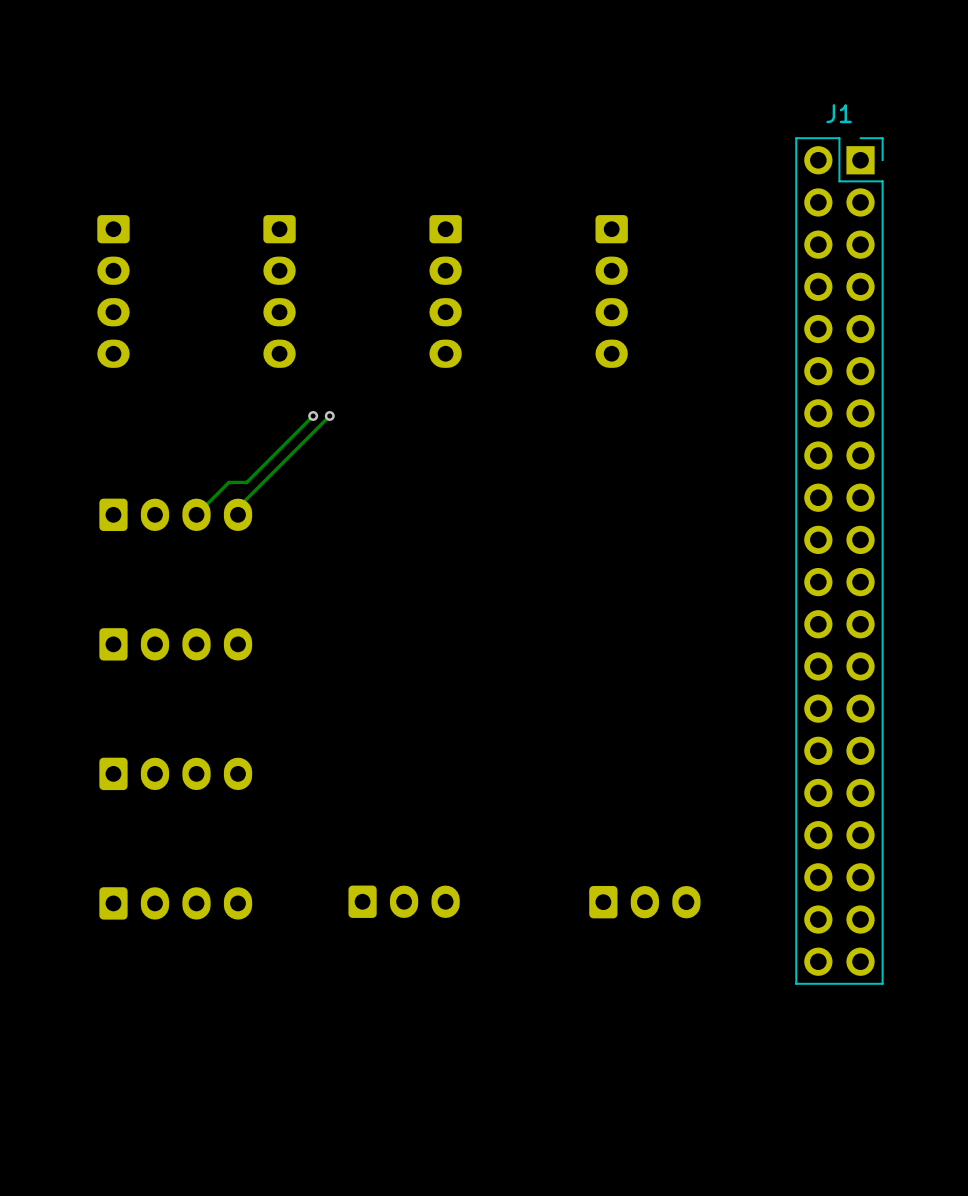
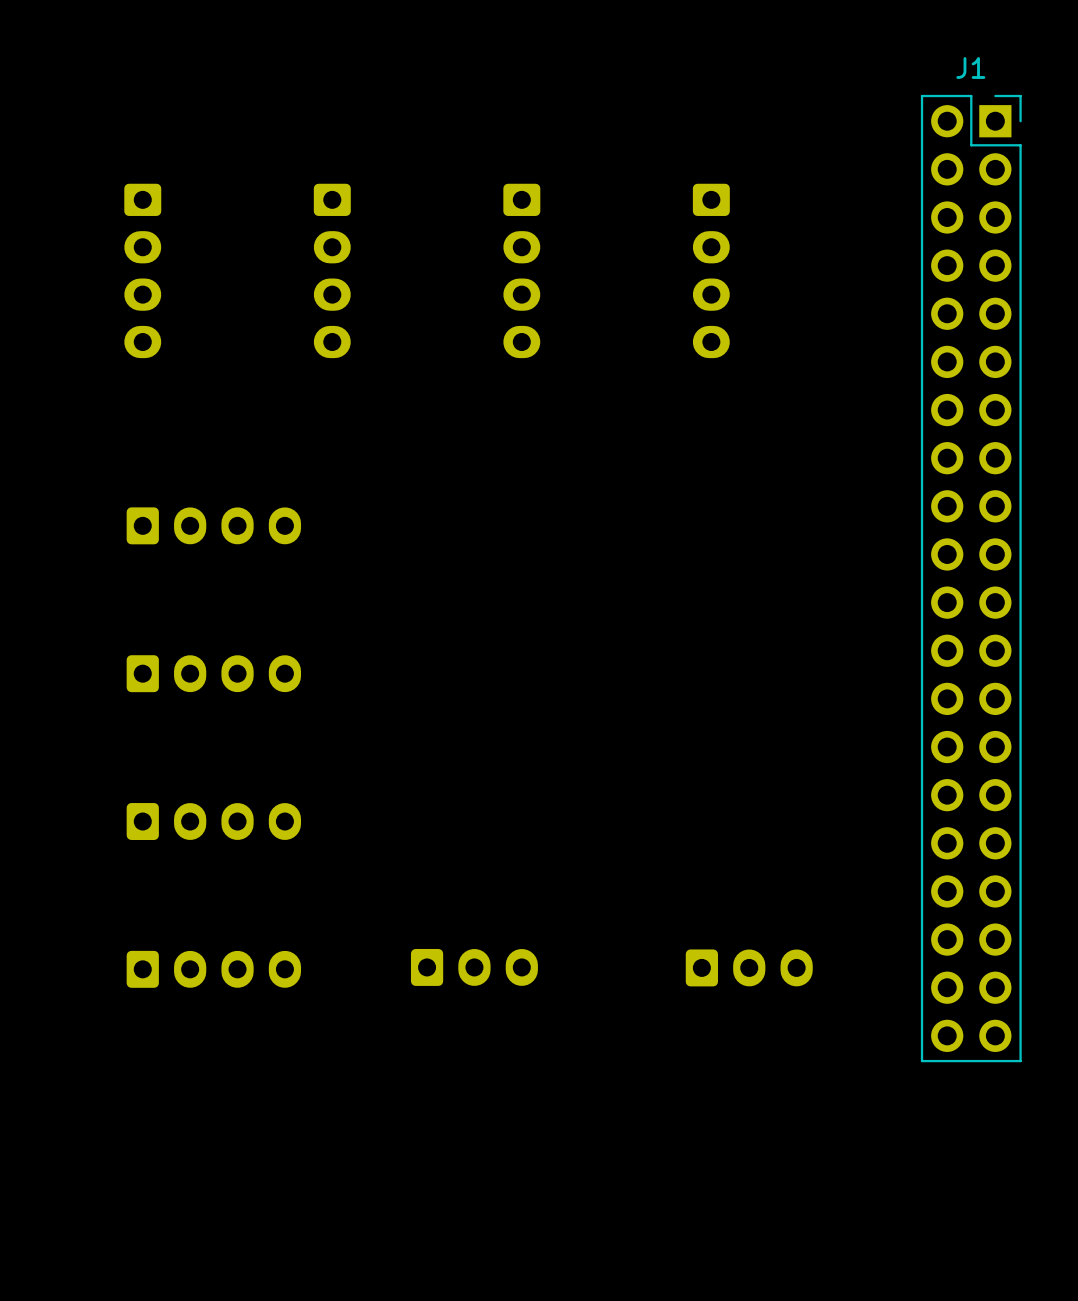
track: (313, 415) (246, 482) (228, 482) (196, 514) -> none
via: (313, 415) -> none
track: (329, 415) (238, 507) (238, 514) -> none
via: (329, 415) -> none

